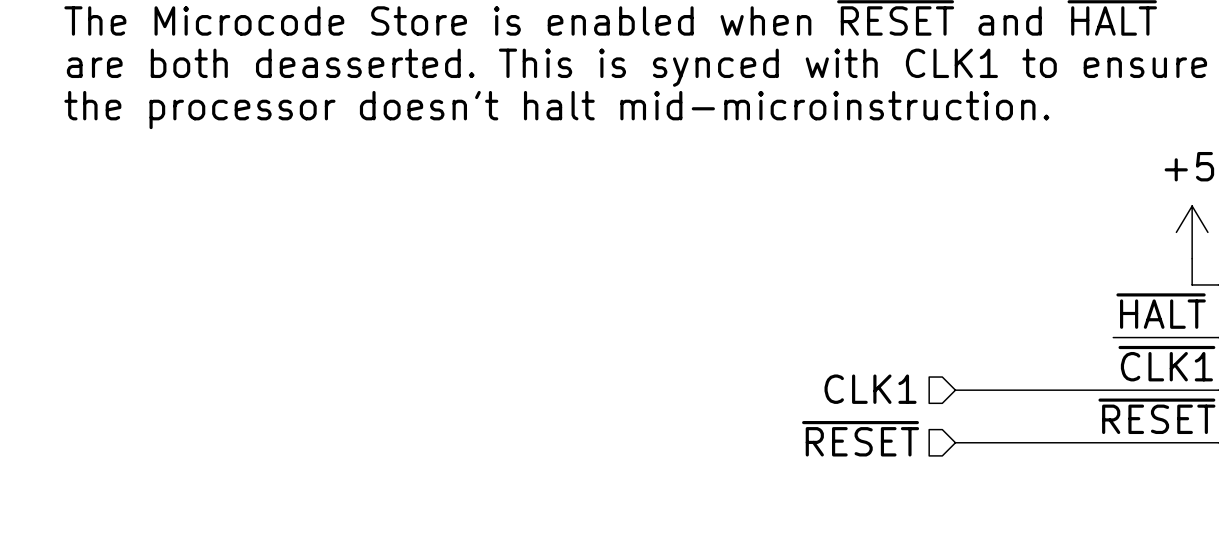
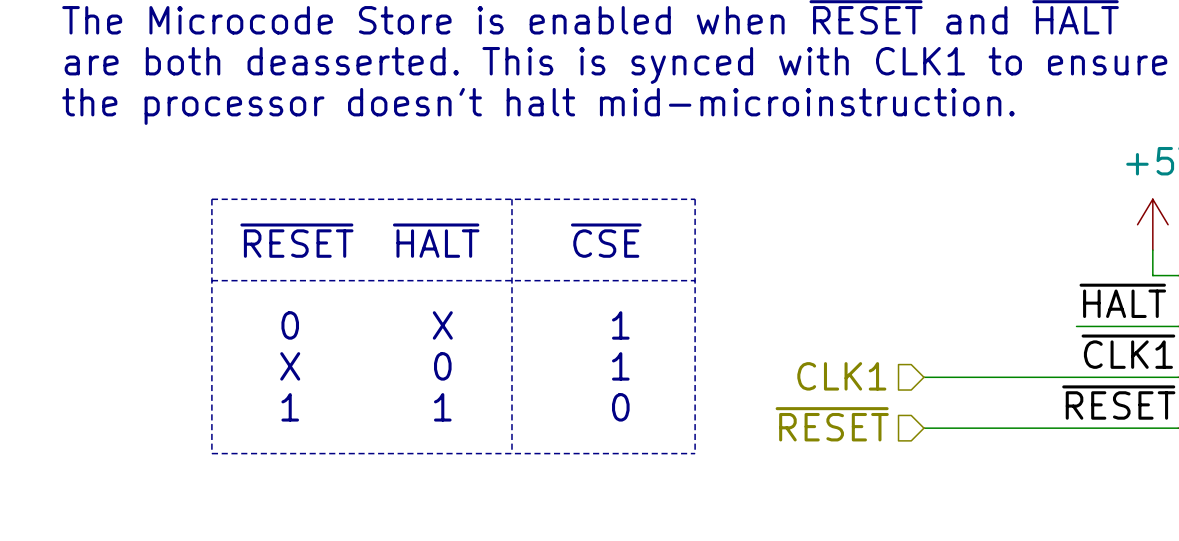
line: none -> (211, 199) (695, 199) (695, 453) (211, 453) (211, 199)
line: none -> (511, 199) (511, 453)
text: none -> ~{RESET} (296, 240)
text: none -> ~{HALT} (436, 240)
text: none -> ~{CSE} (606, 240)
line: none -> (211, 280) (695, 280)
text: none -> 0 (290, 325)
text: none -> X (442, 325)
text: none -> 1 (620, 325)
text: none -> X (290, 366)
text: none -> 0 (442, 366)
text: none -> 1 (620, 366)
text: none -> 1 (290, 407)
text: none -> 1 (442, 407)
text: none -> 0 (620, 407)

